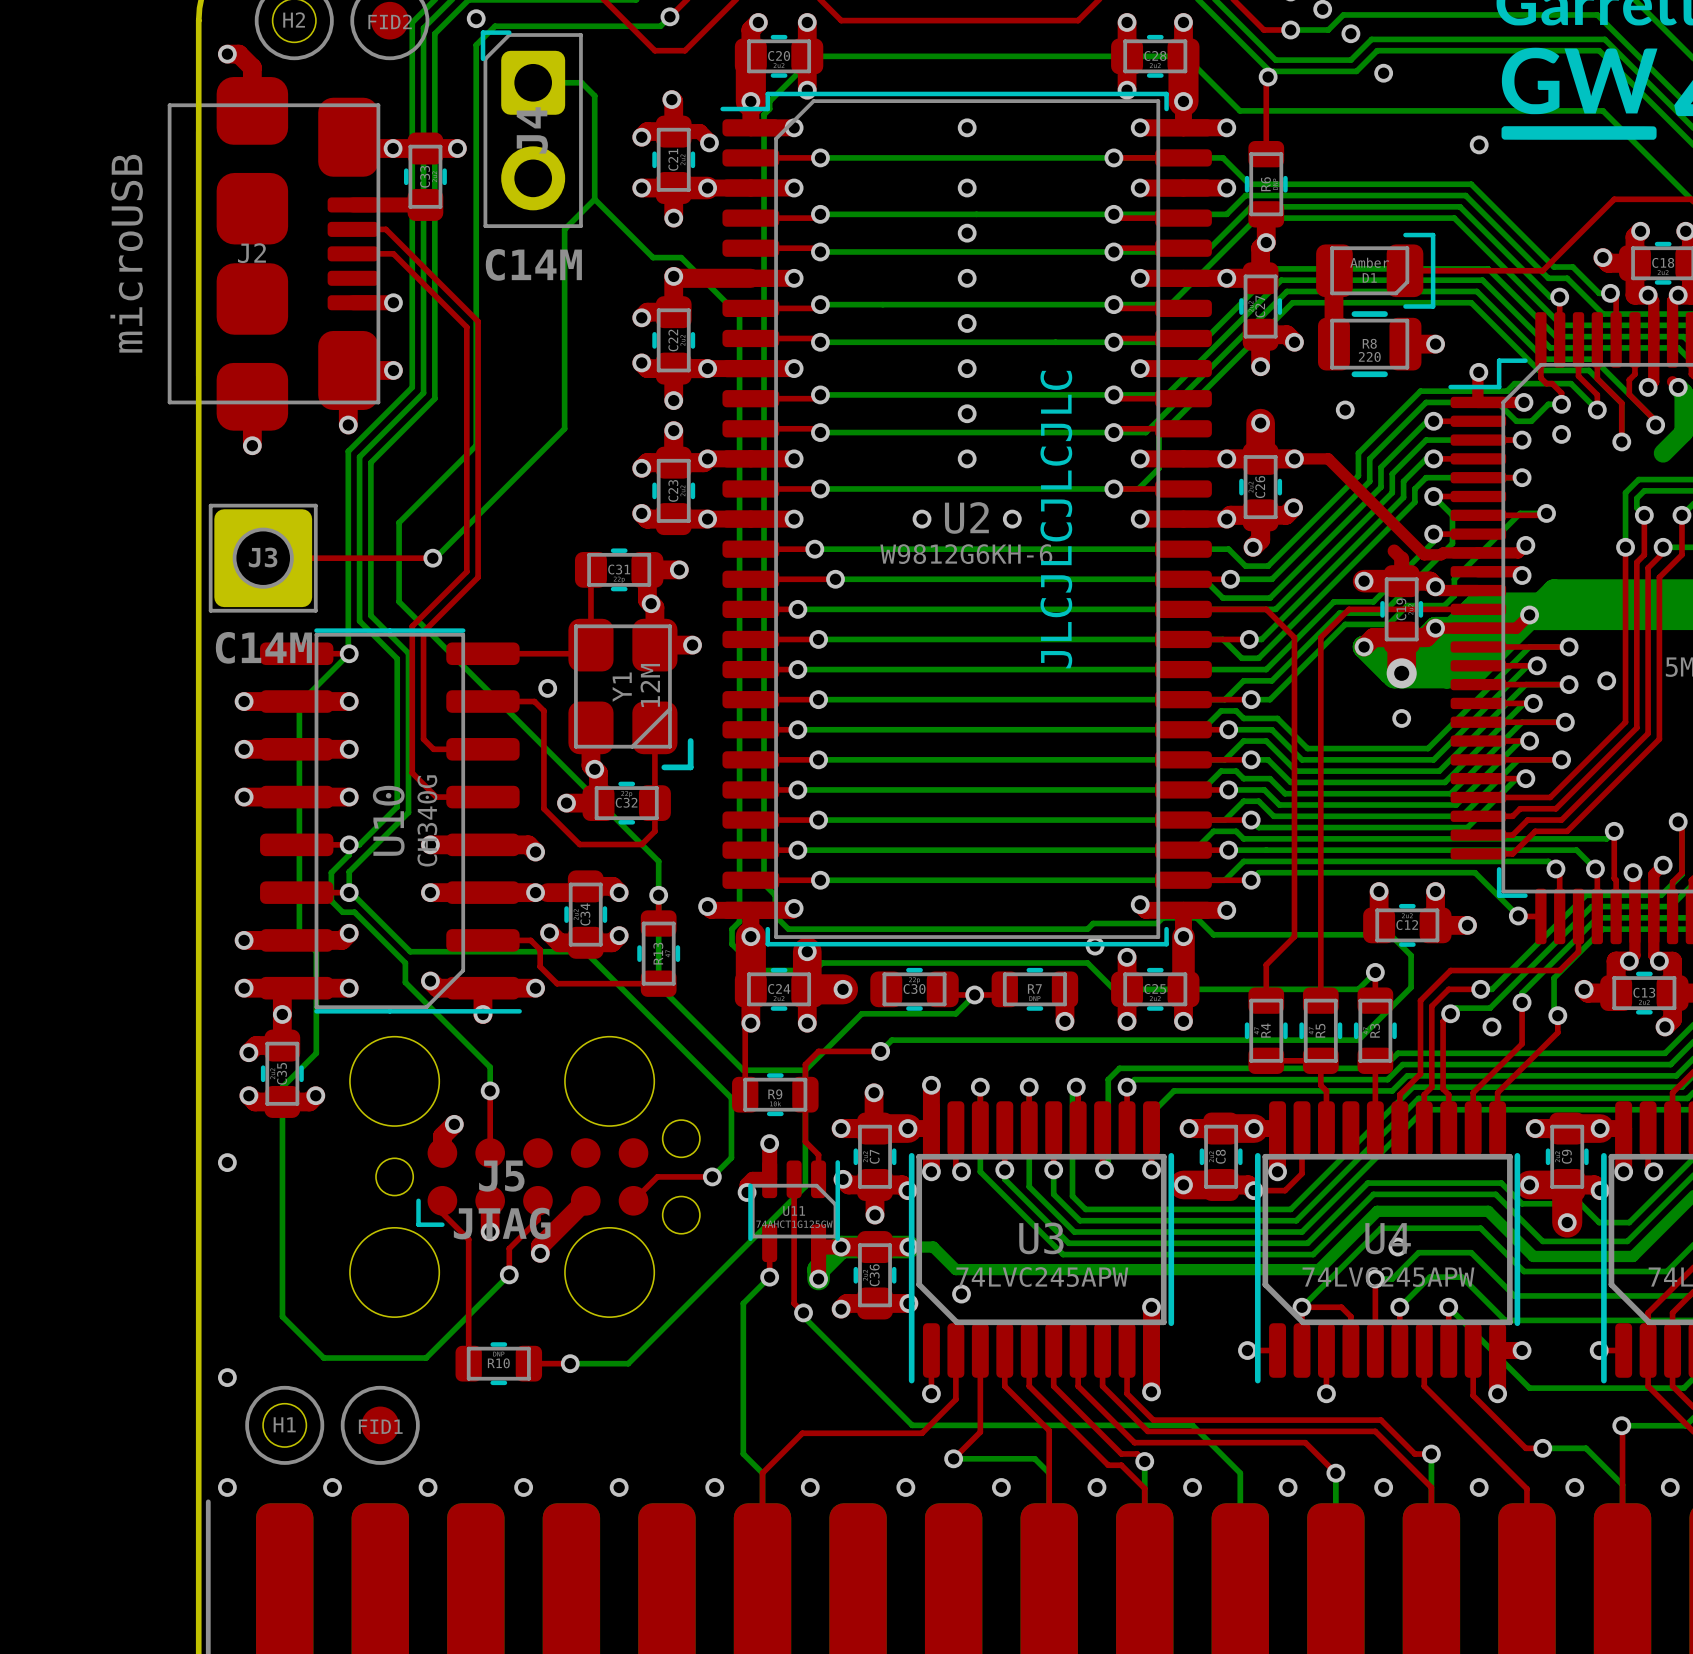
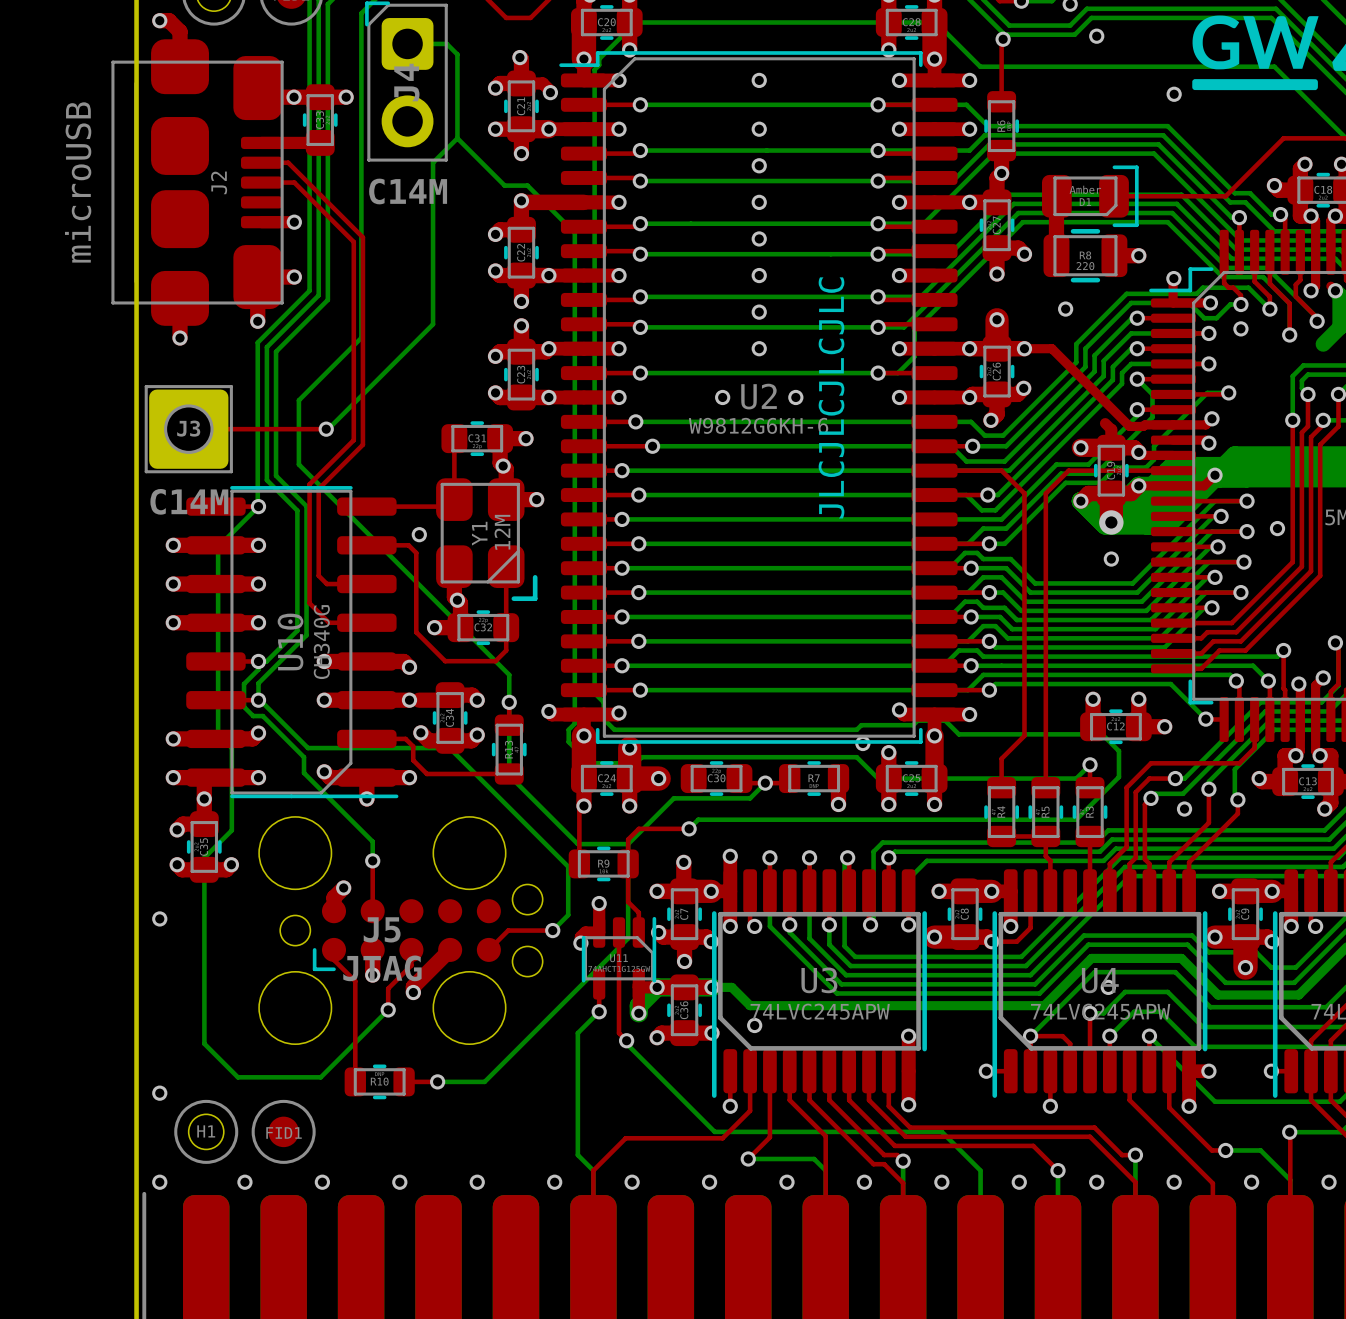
J2 name rotation: 0° (251, 253) -> 90° counterclockwise (219, 182)
J2 name position: J2 (251, 253) -> J2 (219, 182)

